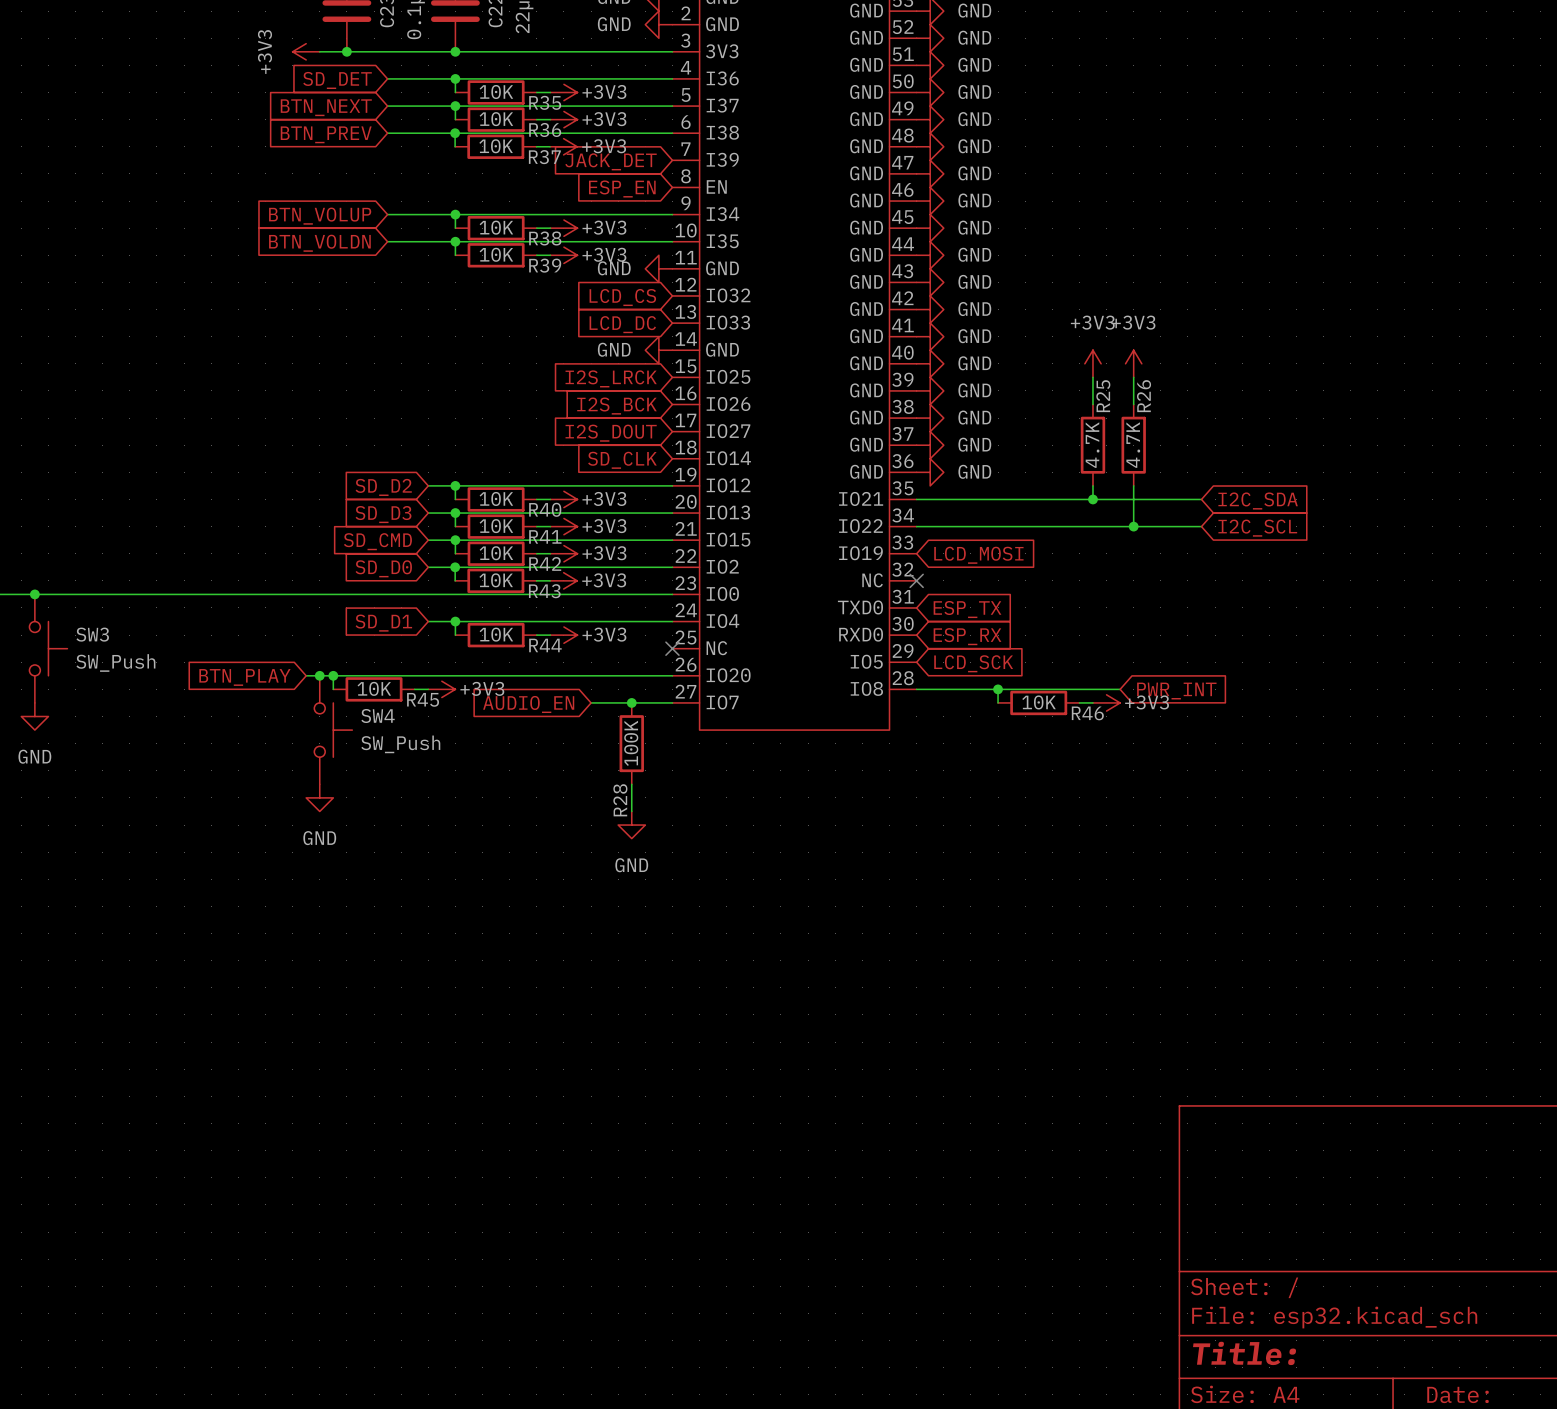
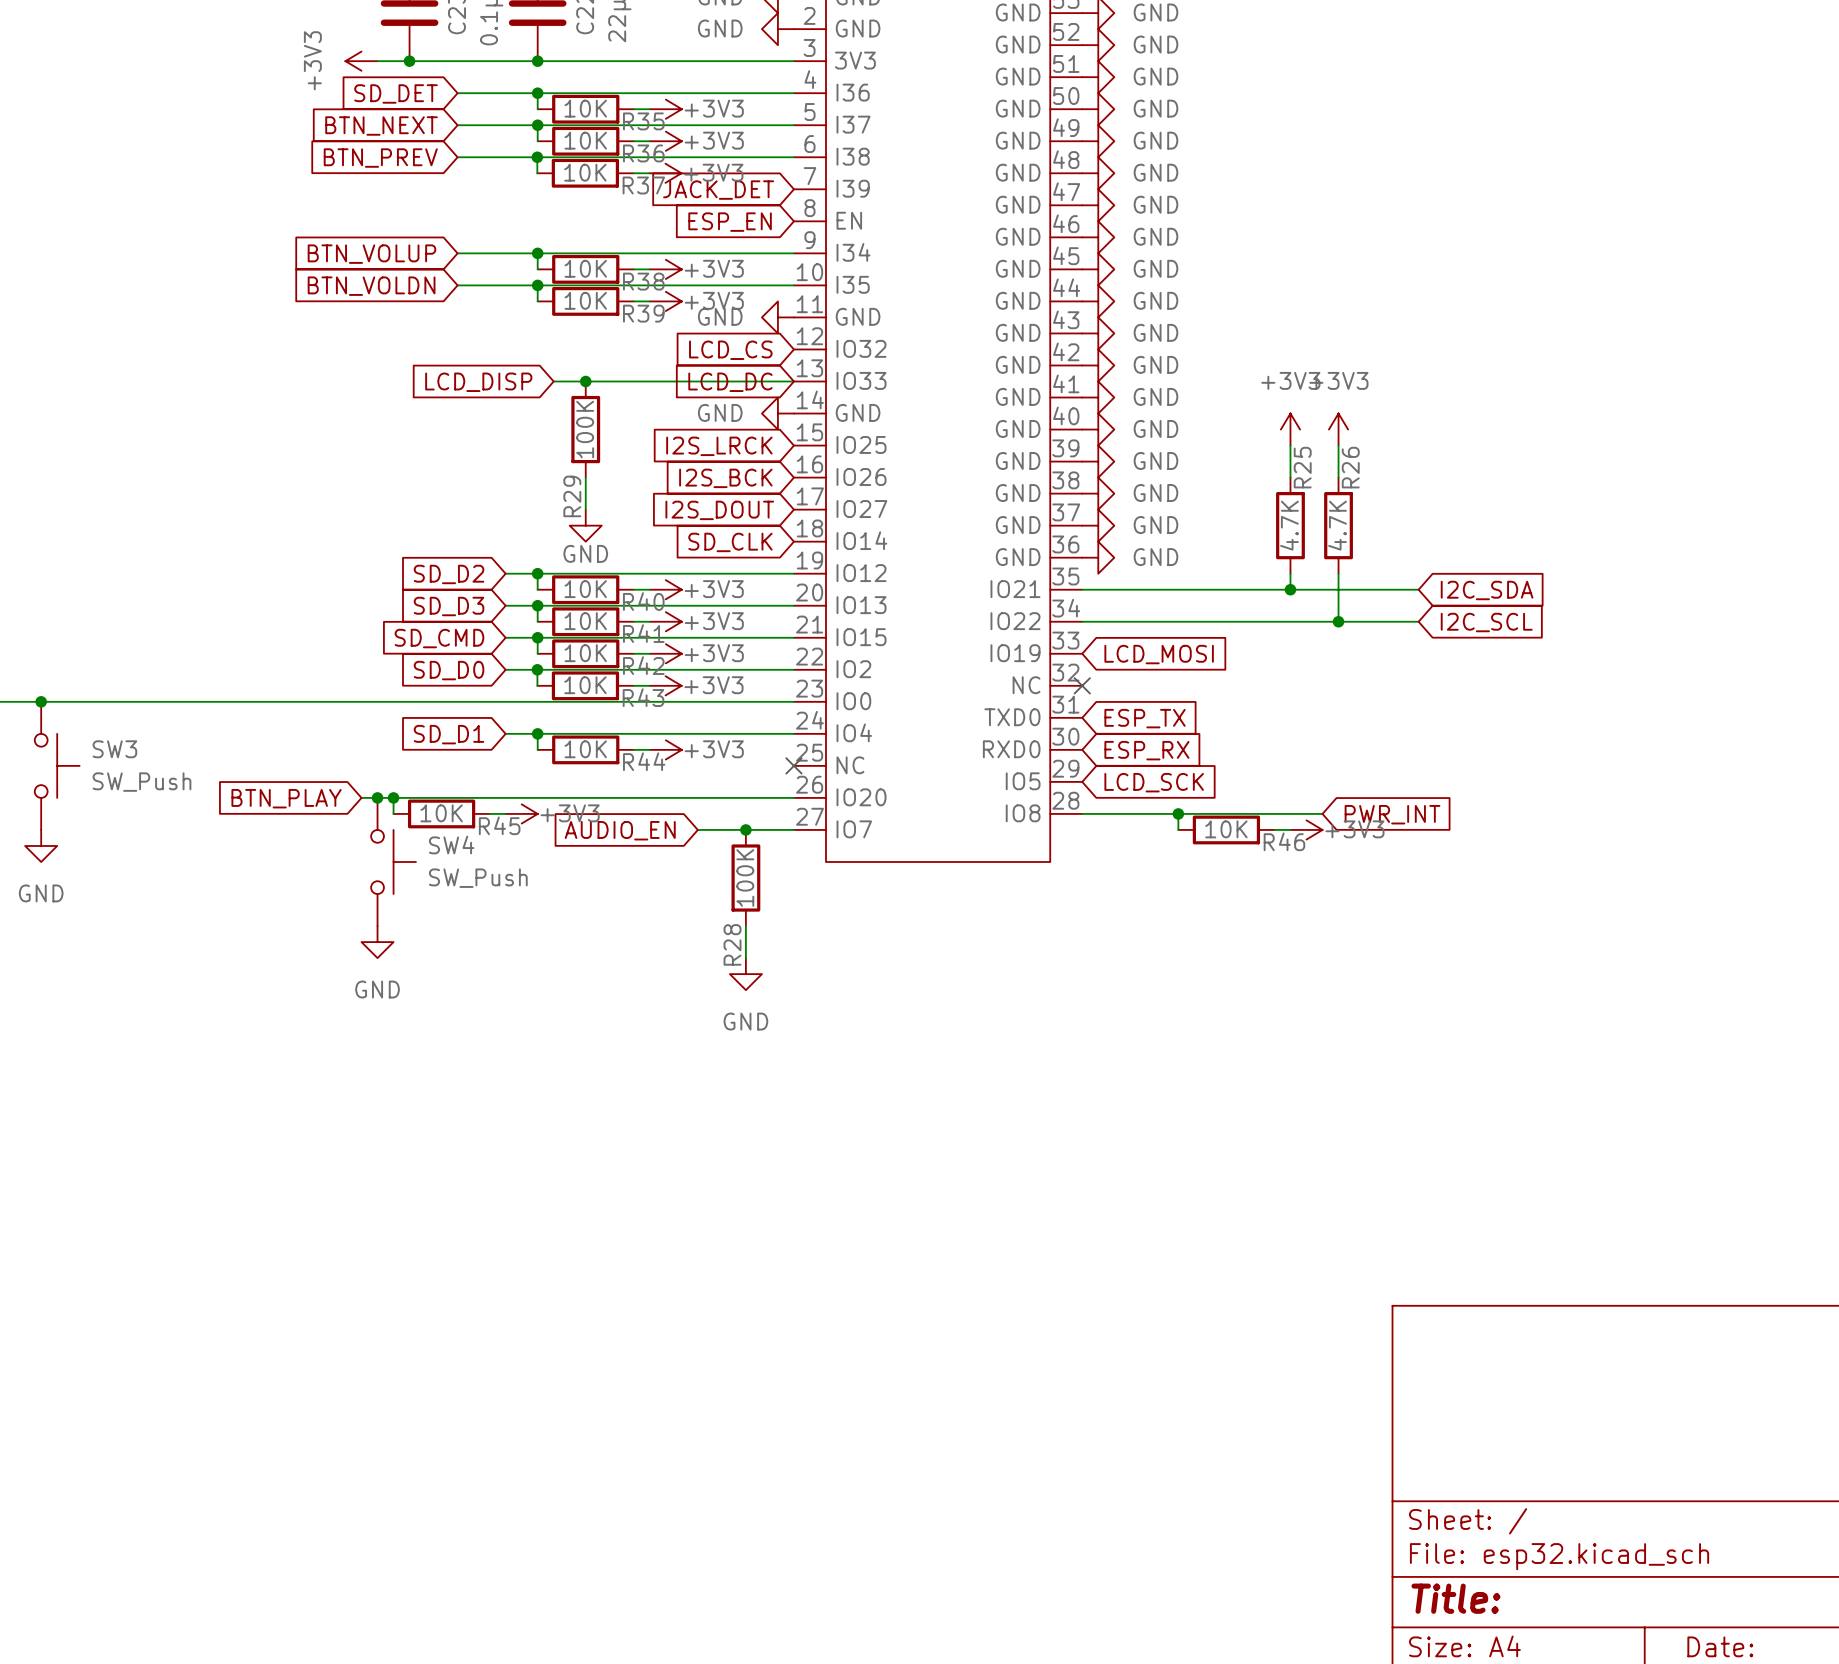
wire: none -> (553, 381) (793, 381)
junction: none -> (585, 381)
global label: none -> LCD_DISP (478, 382)
R29: none -> 100K (585, 429)
wire: none -> (585, 477) (585, 509)
power symbol: none -> GND (585, 525)

